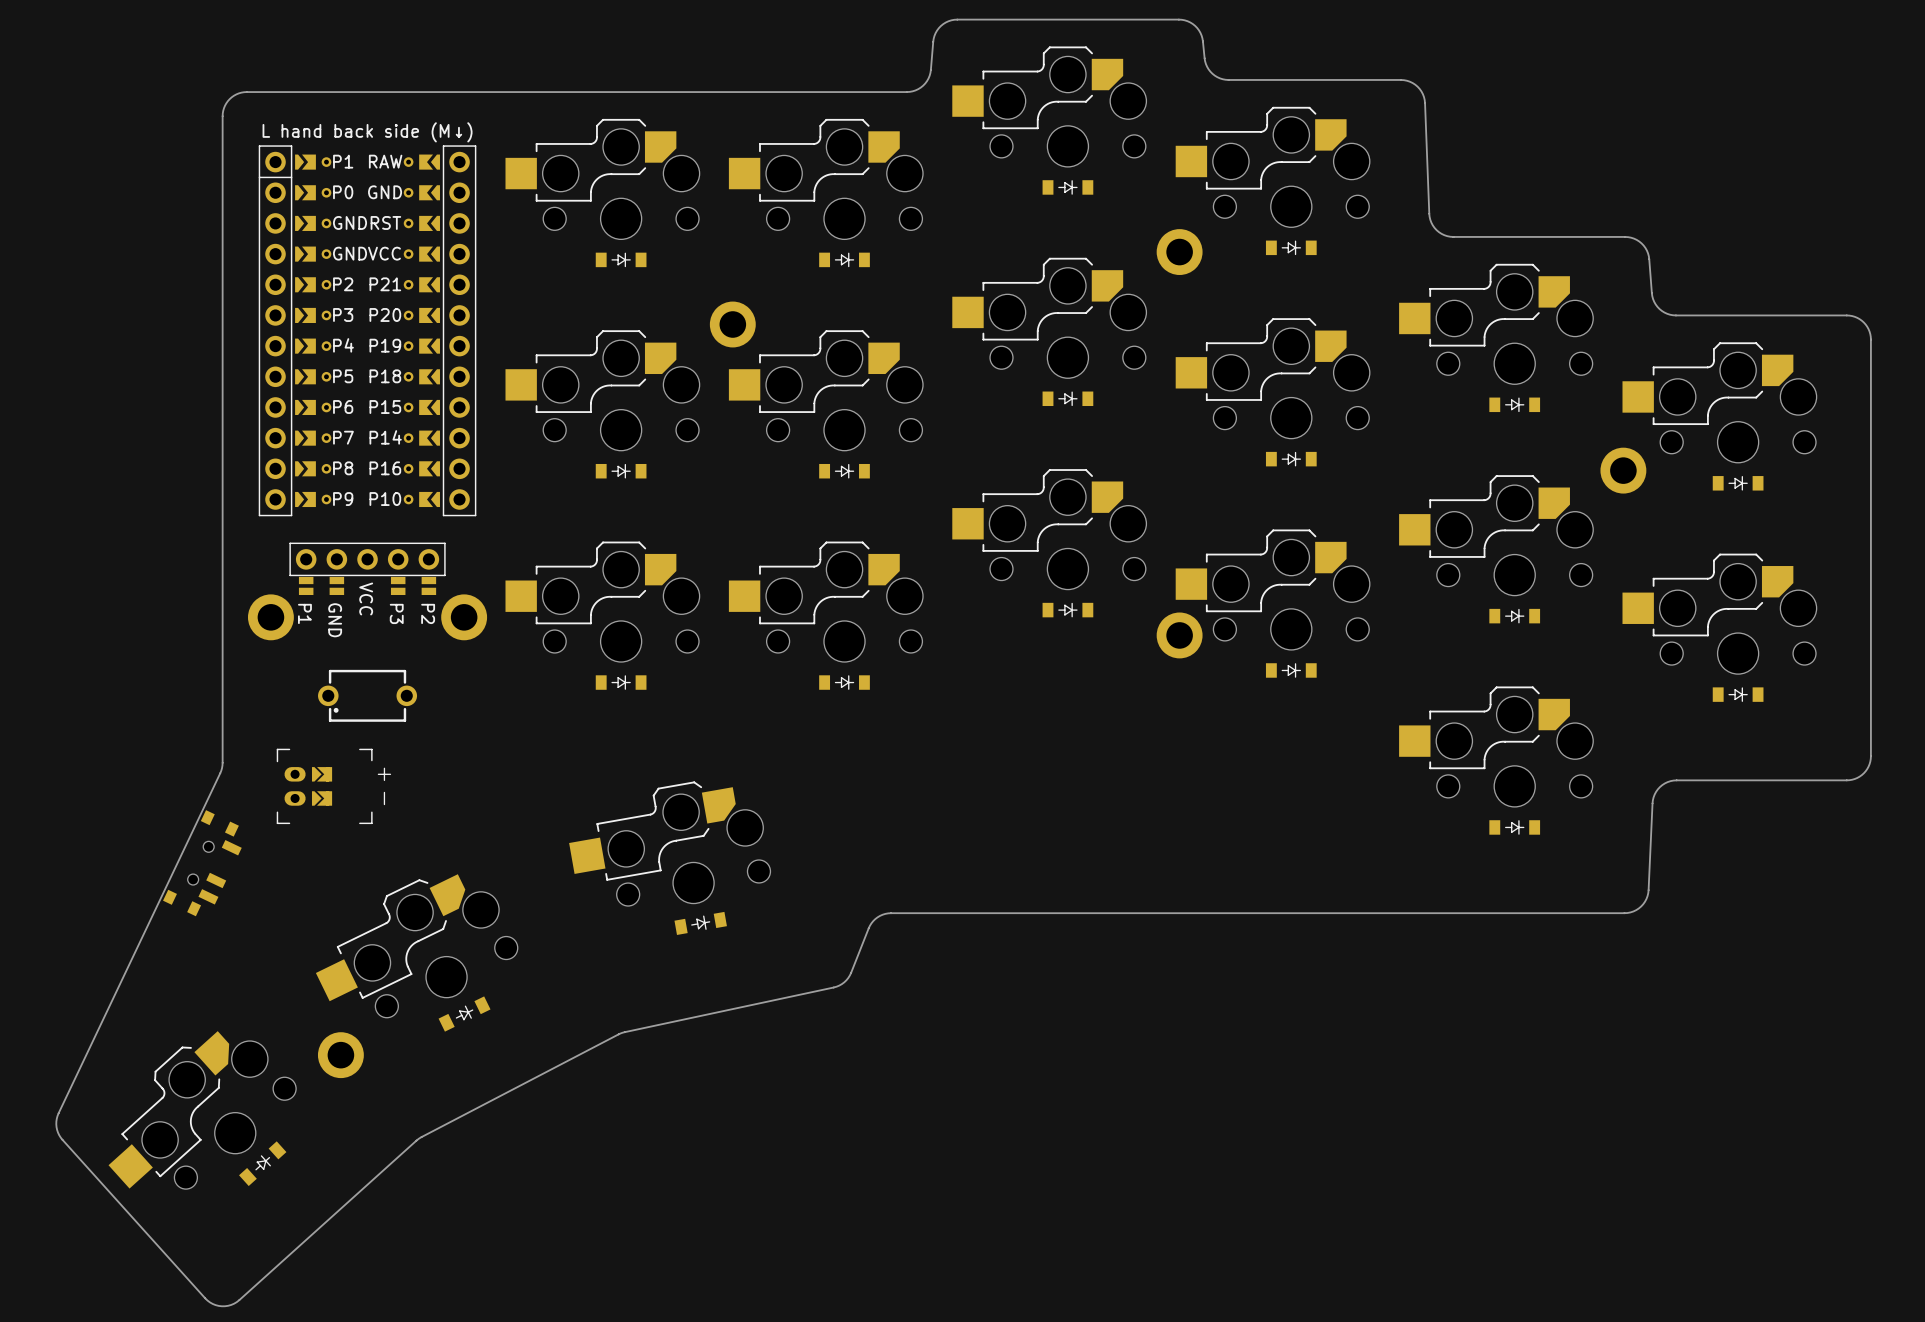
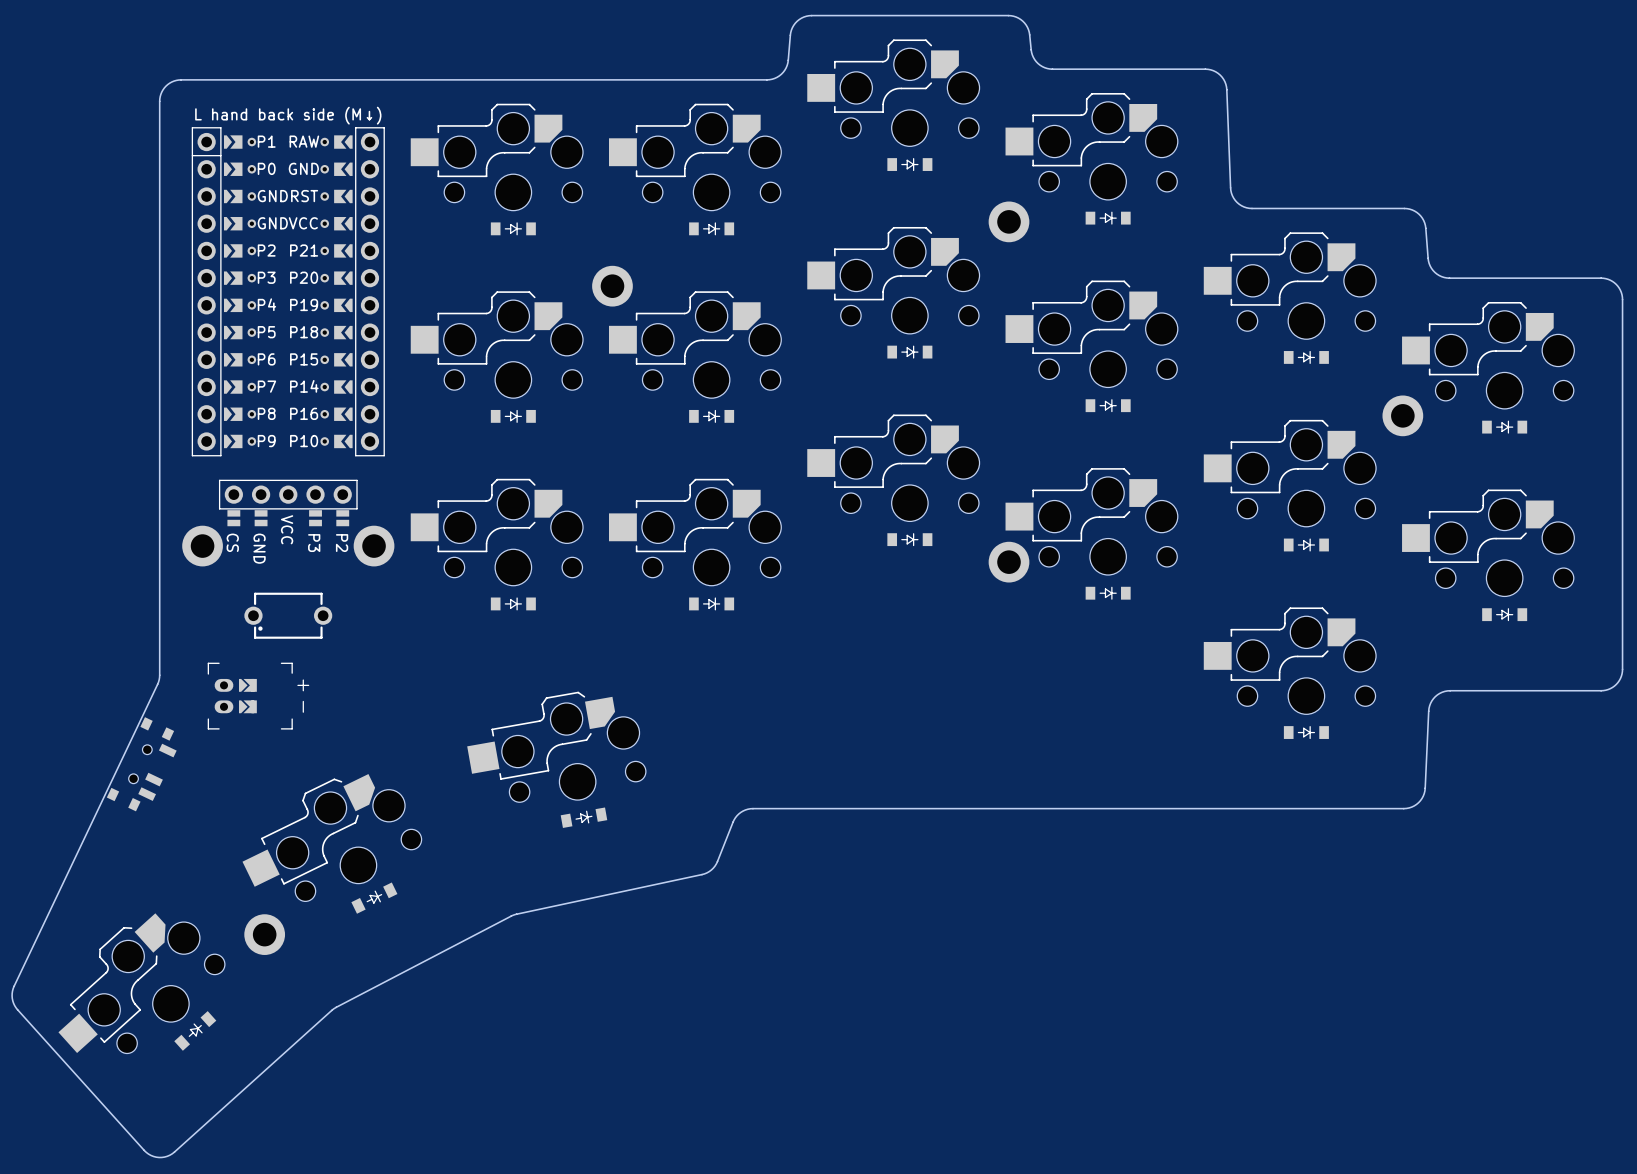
part text: P1 (304, 613) -> CS (232, 542)

